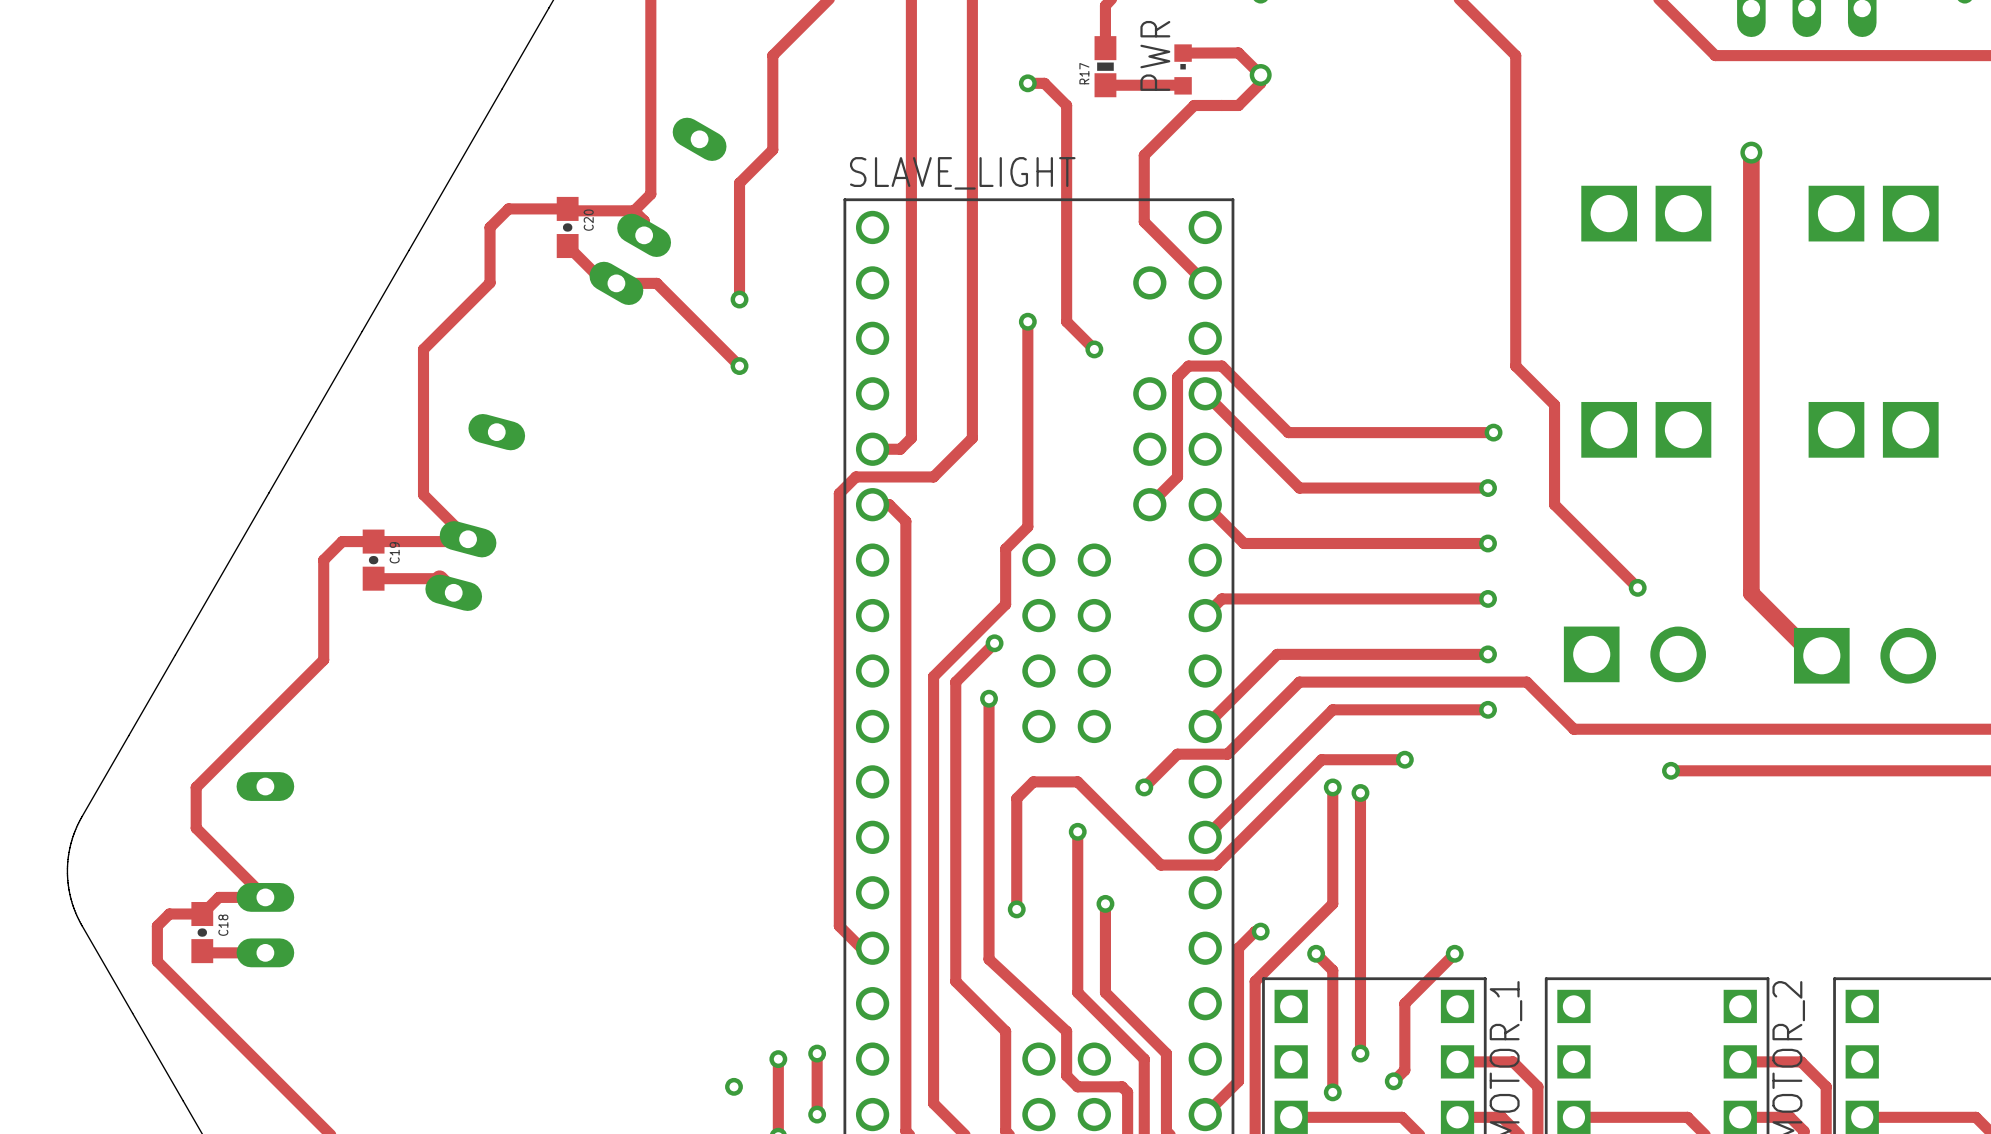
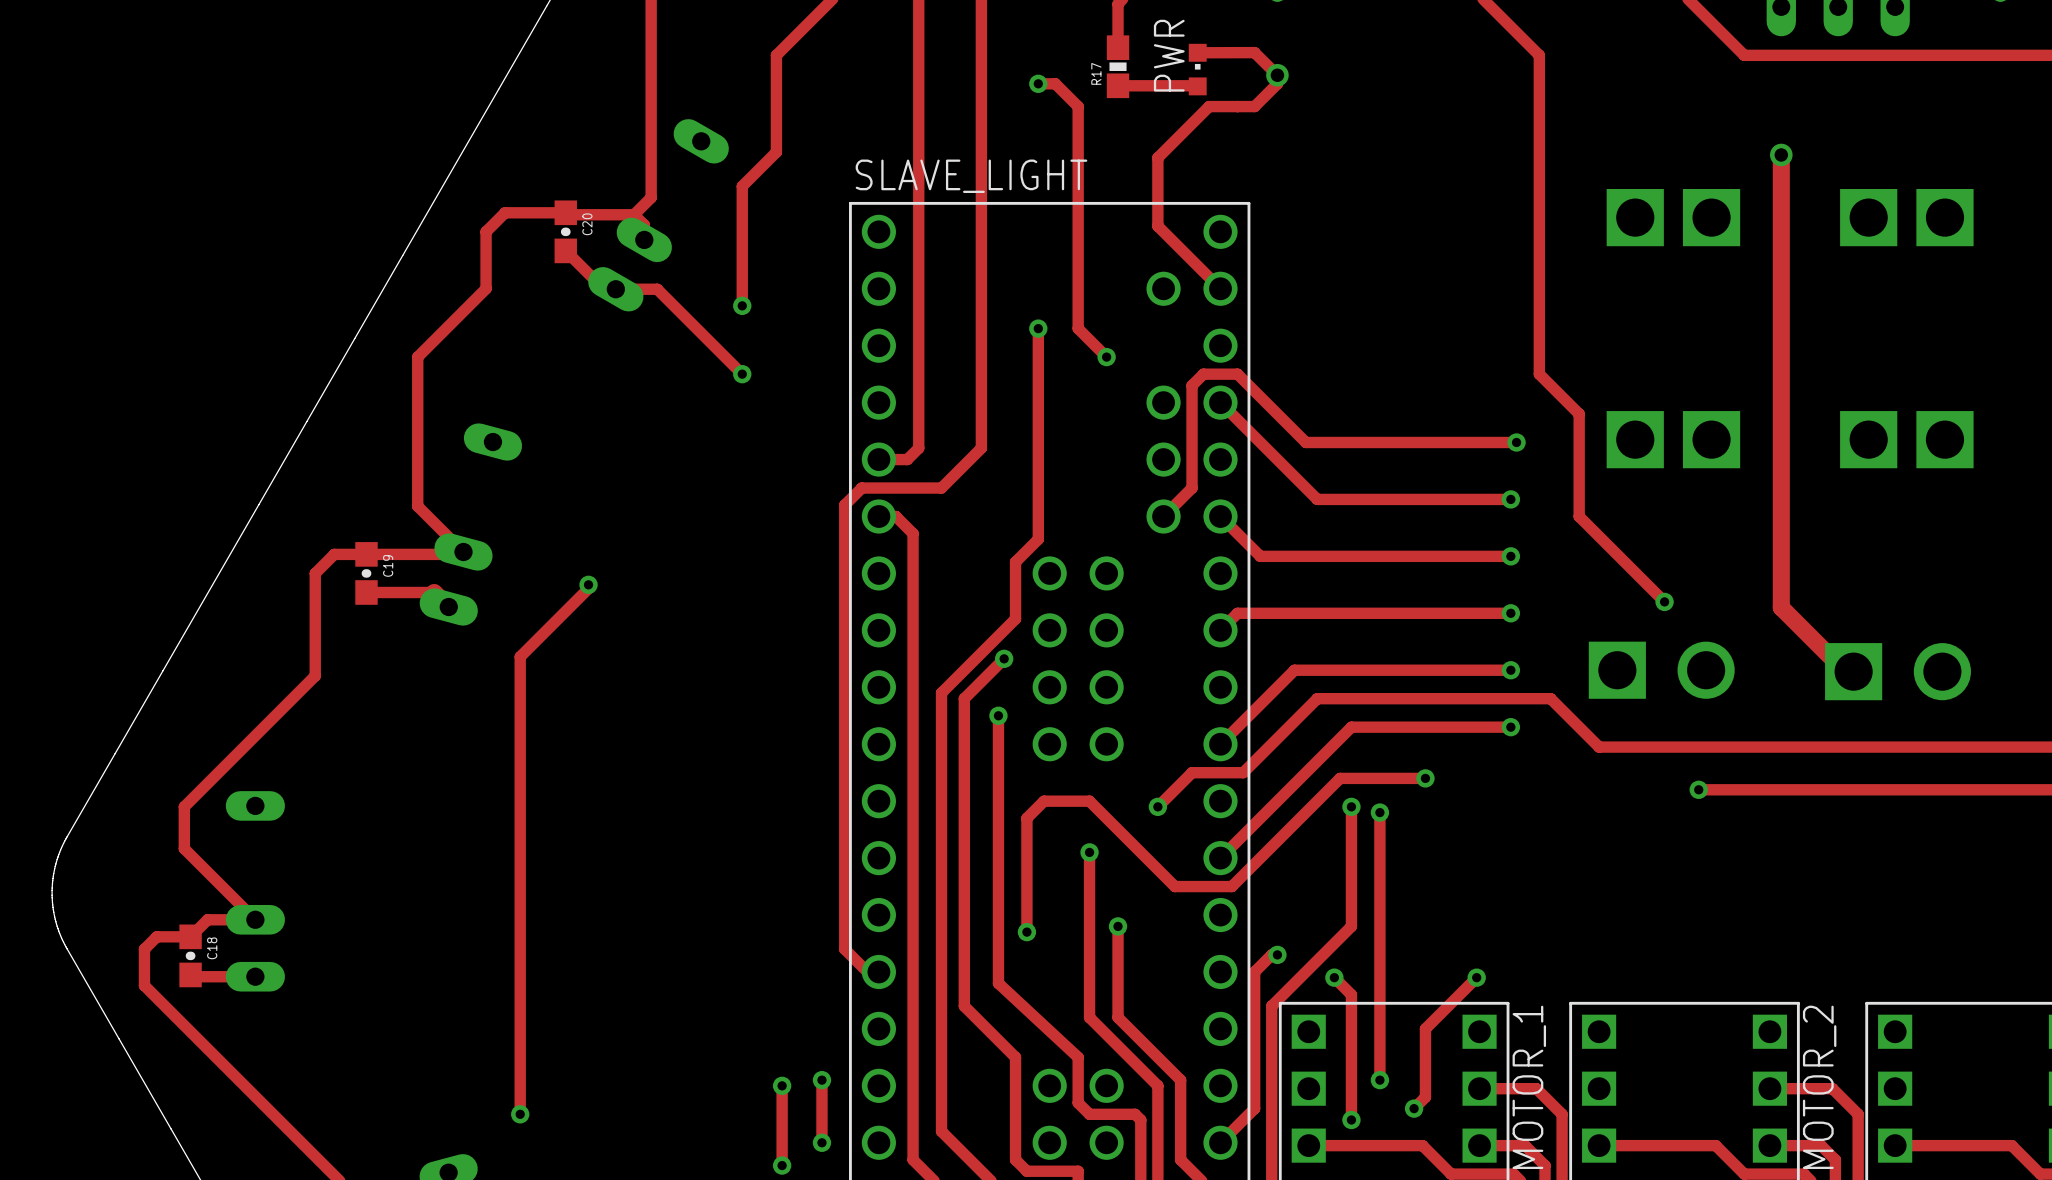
track: none -> (588, 584) (588, 588) (520, 656) (520, 1114) (518, 1112)
via: none -> (588, 584)
via: none -> (520, 1114)
via: (733, 1086) -> none

